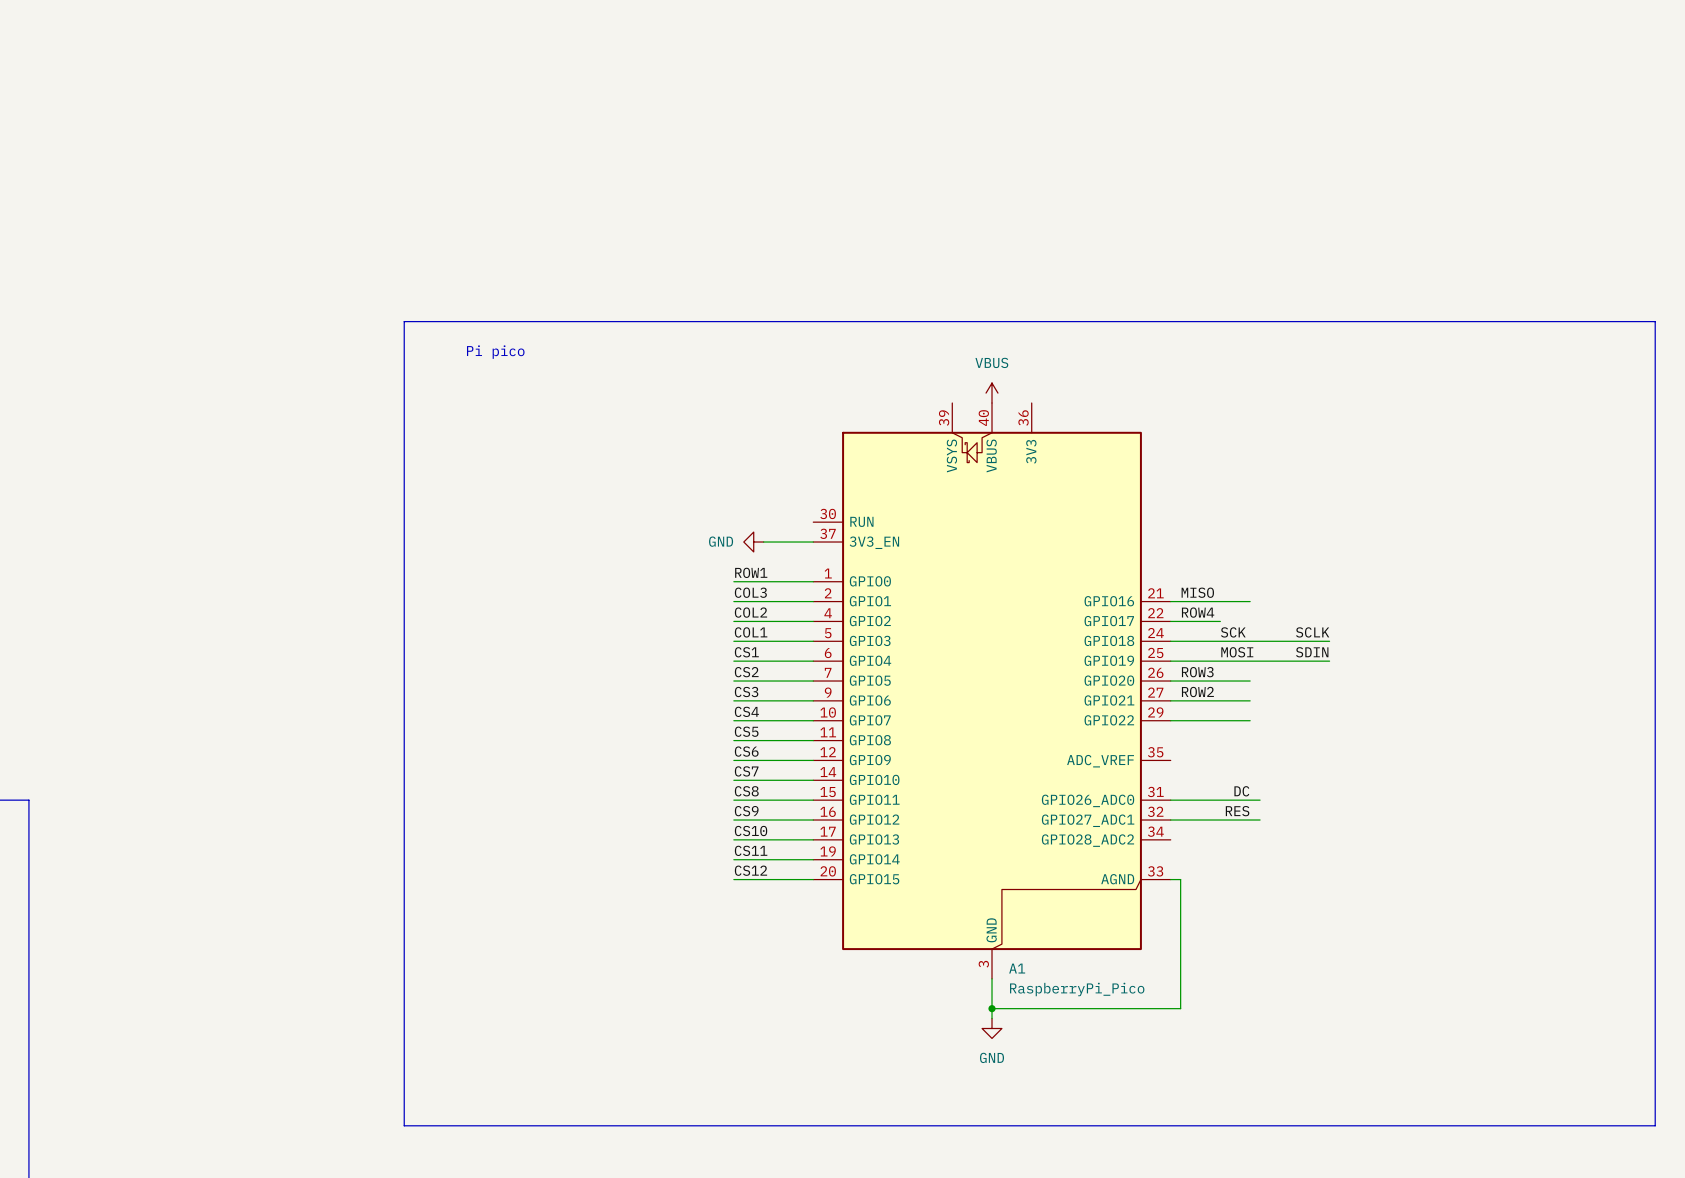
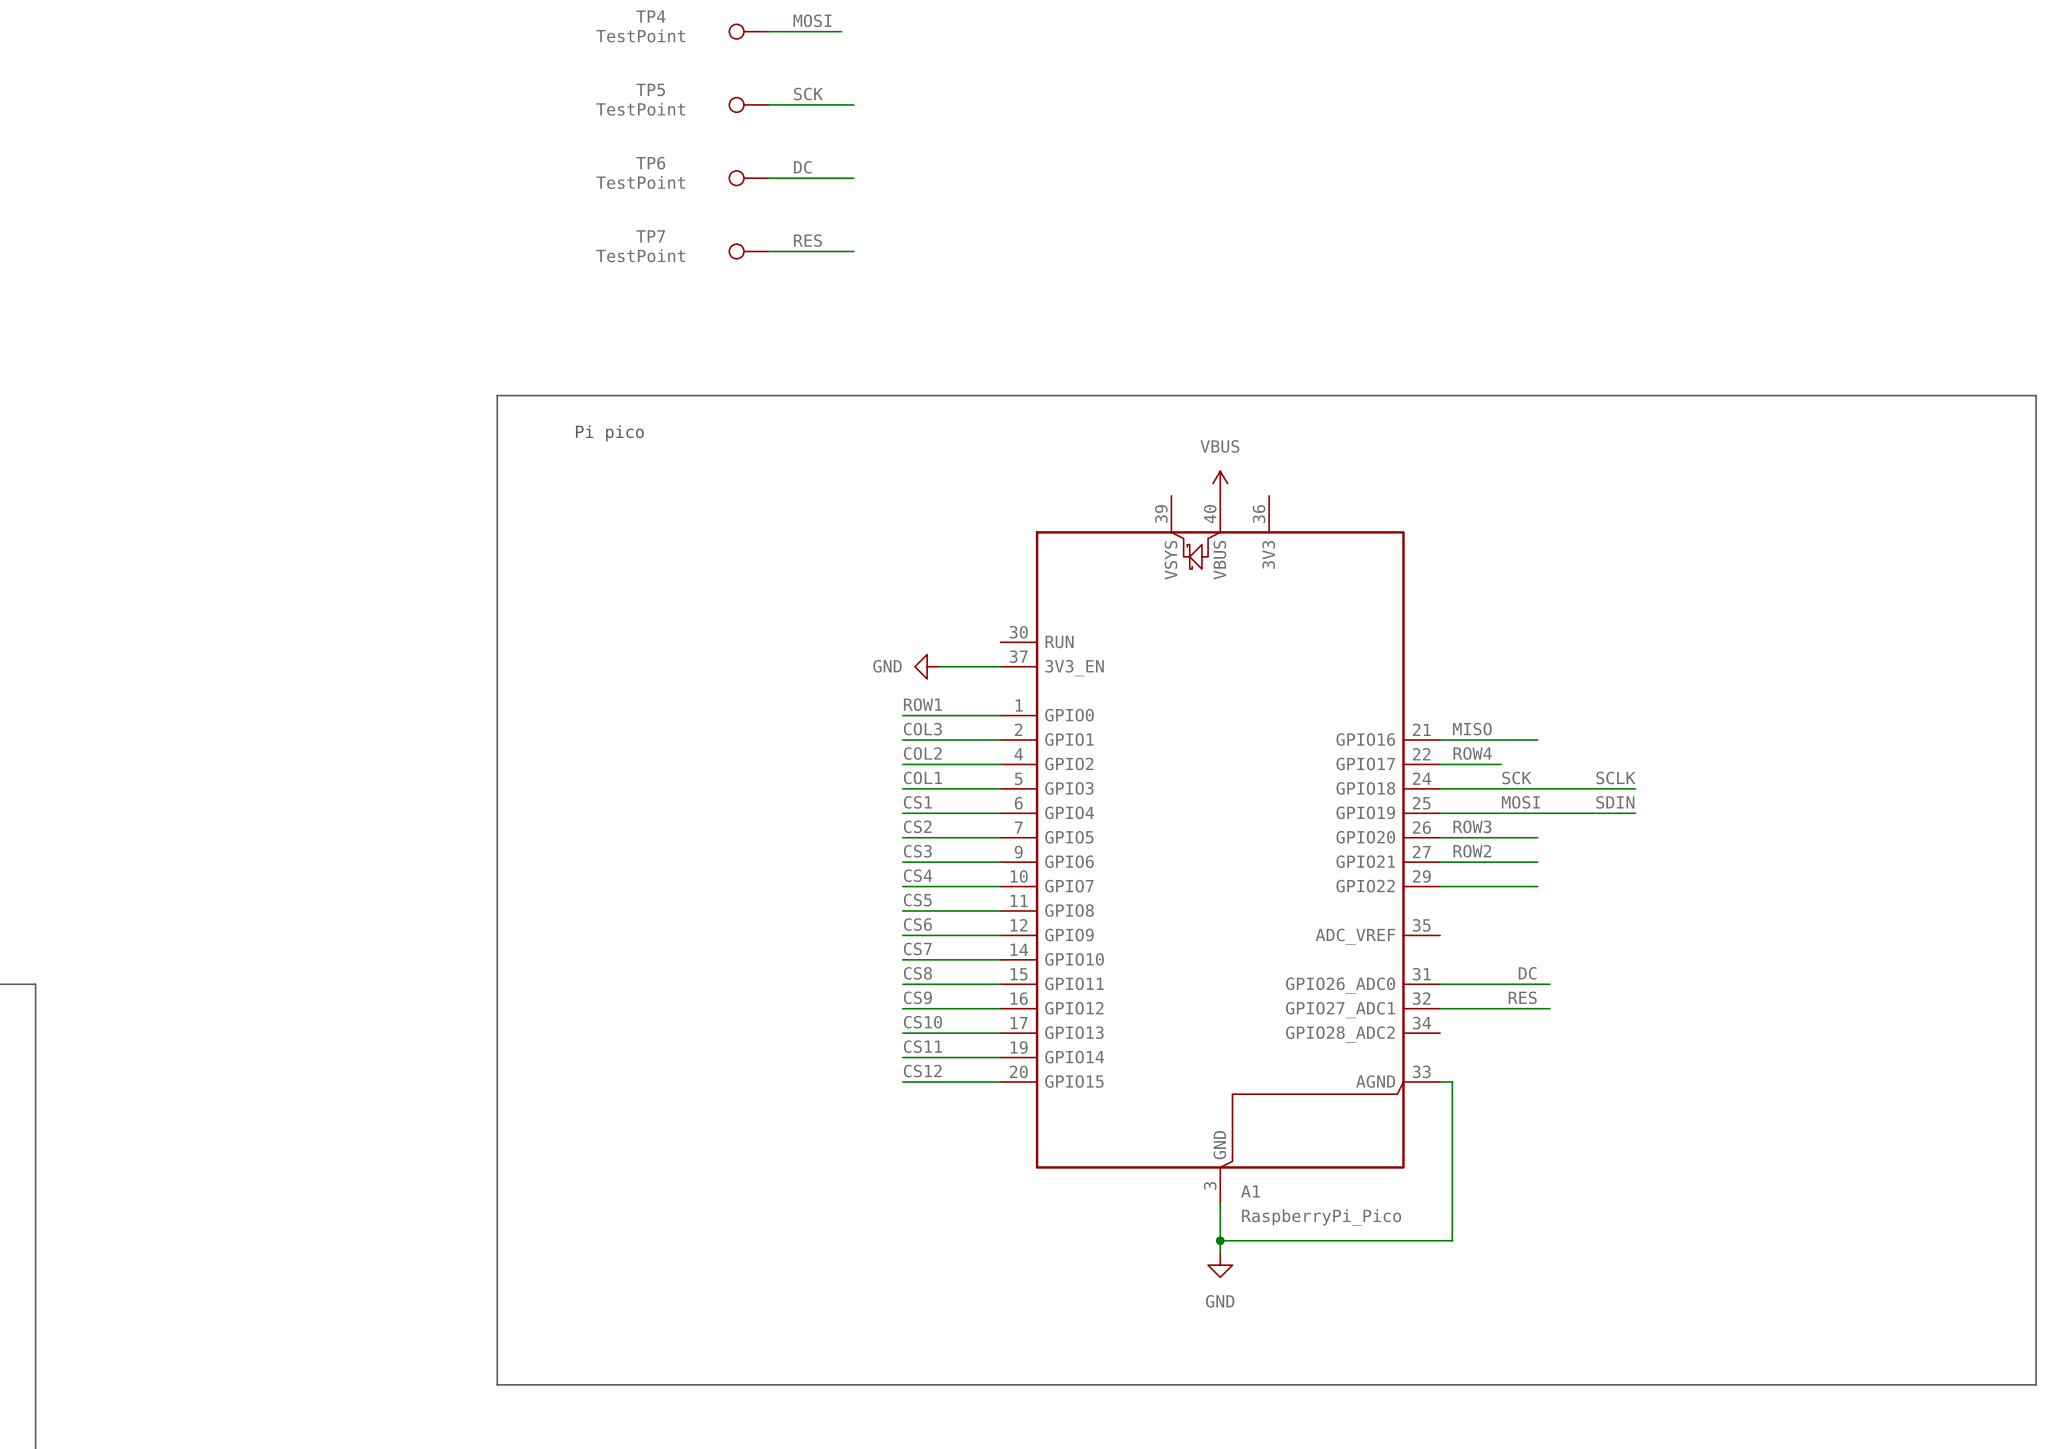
label: none -> MOSI (812, 20)
TP4: none -> TestPoint (748, 31)
wire: none -> (768, 31) (841, 31)
label: none -> SCK (808, 94)
TP5: none -> TestPoint (748, 104)
wire: none -> (768, 104) (853, 104)
label: none -> DC (802, 167)
TP6: none -> TestPoint (748, 178)
wire: none -> (768, 178) (853, 178)
label: none -> RES (807, 240)
TP7: none -> TestPoint (748, 251)
wire: none -> (768, 251) (853, 251)

